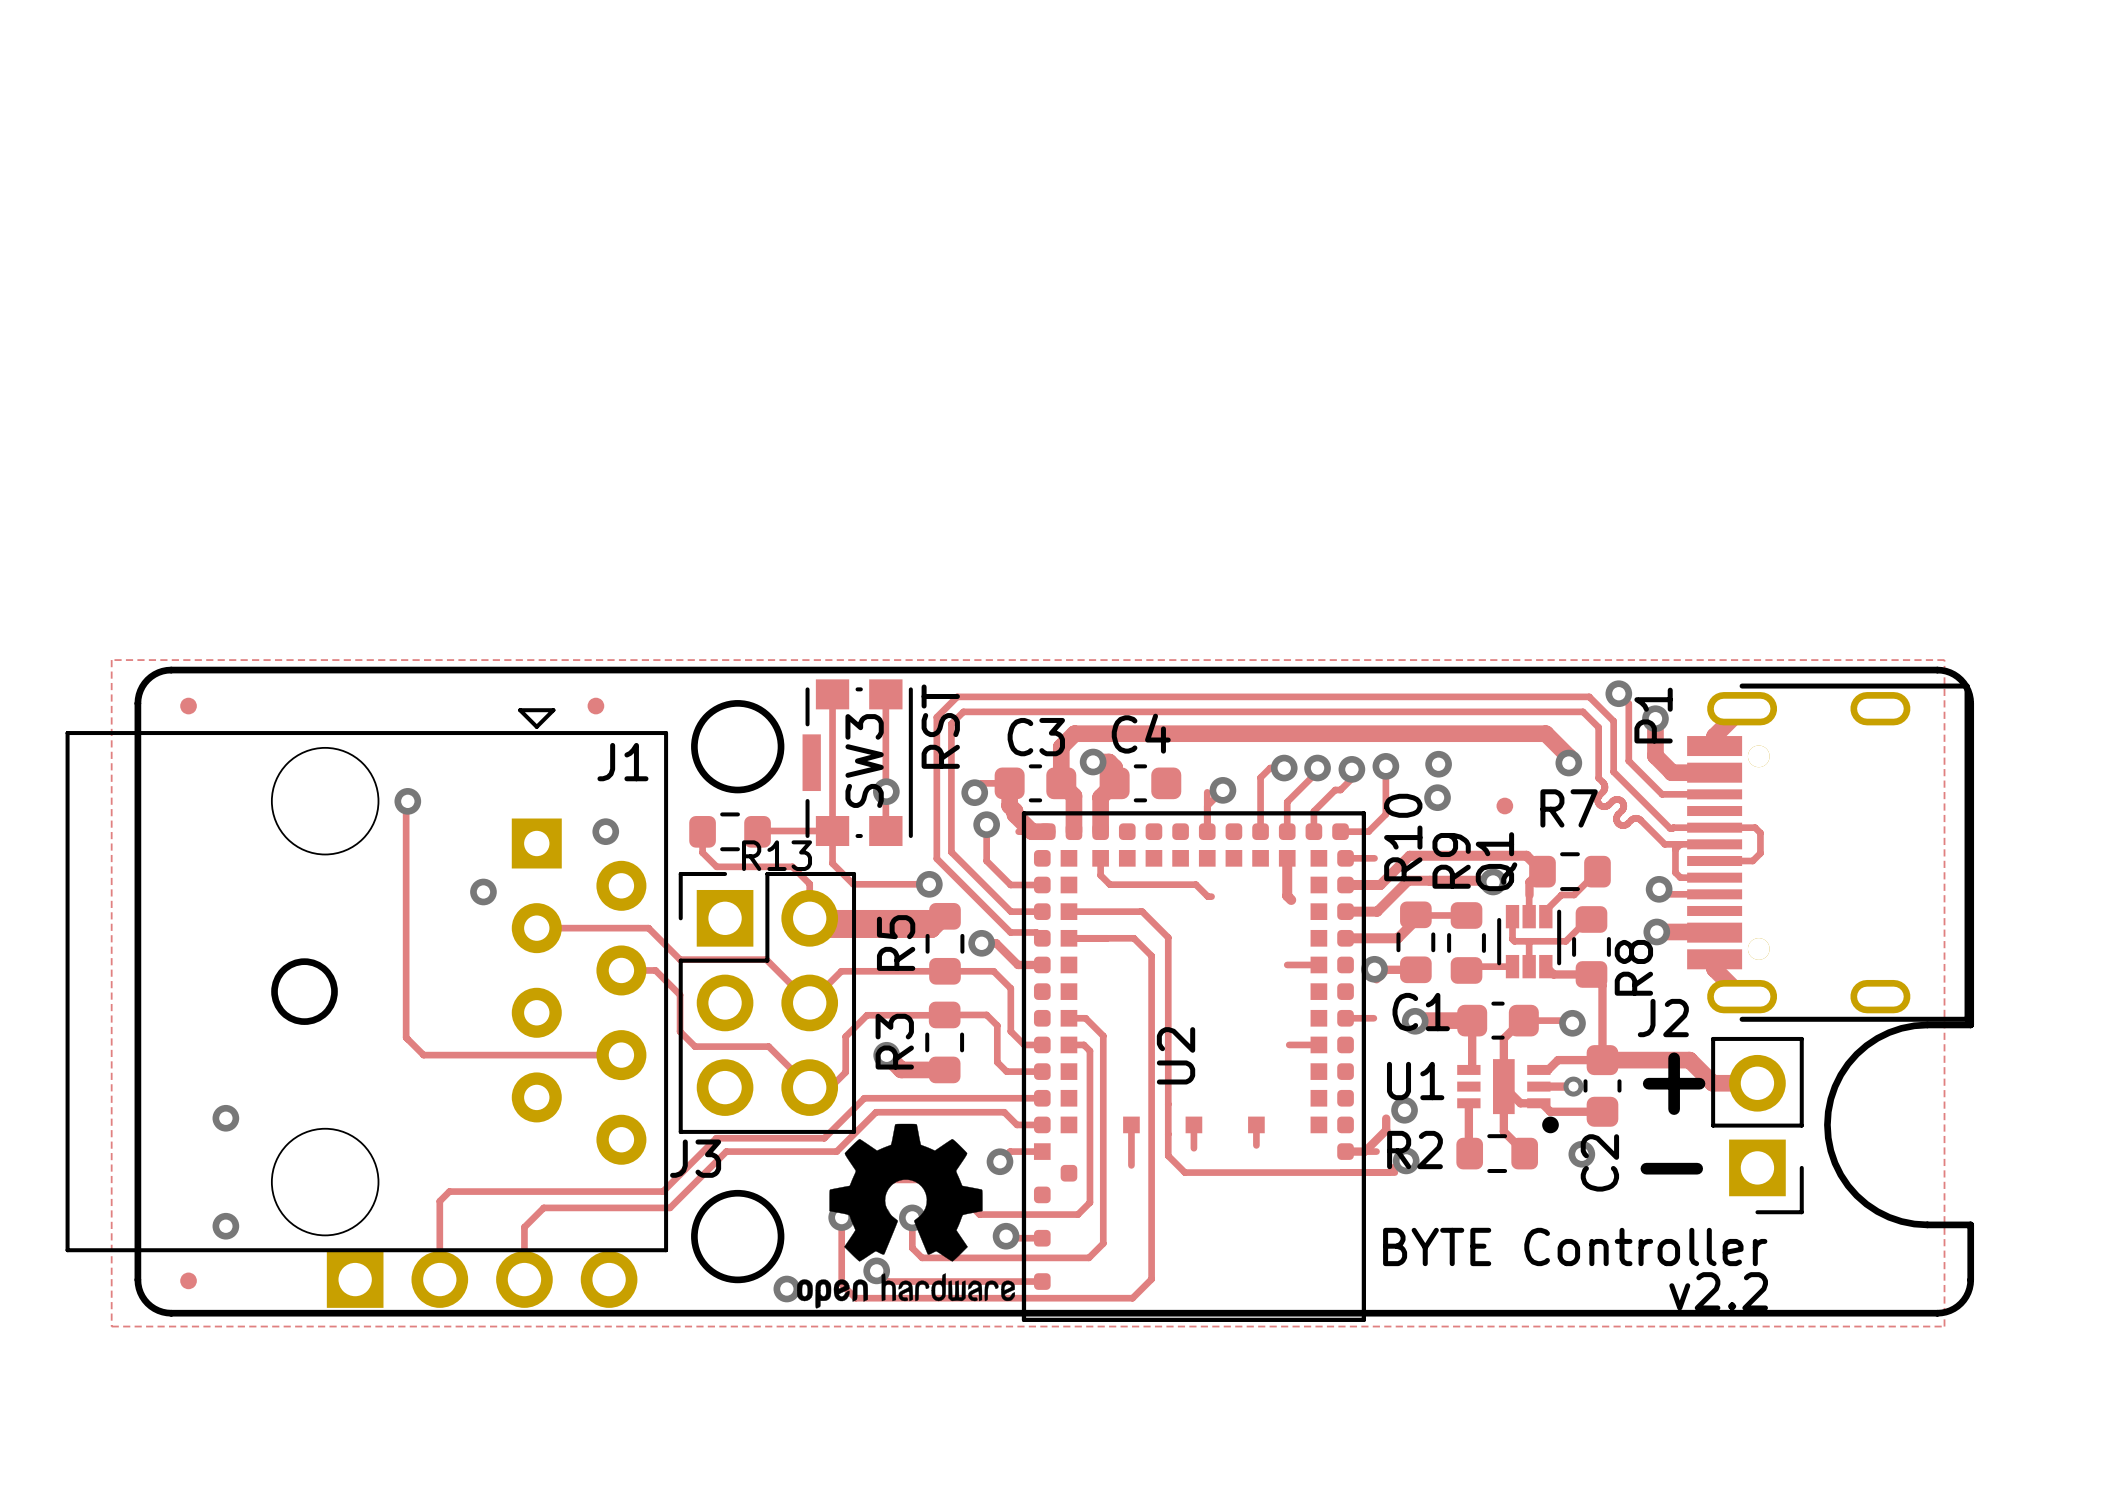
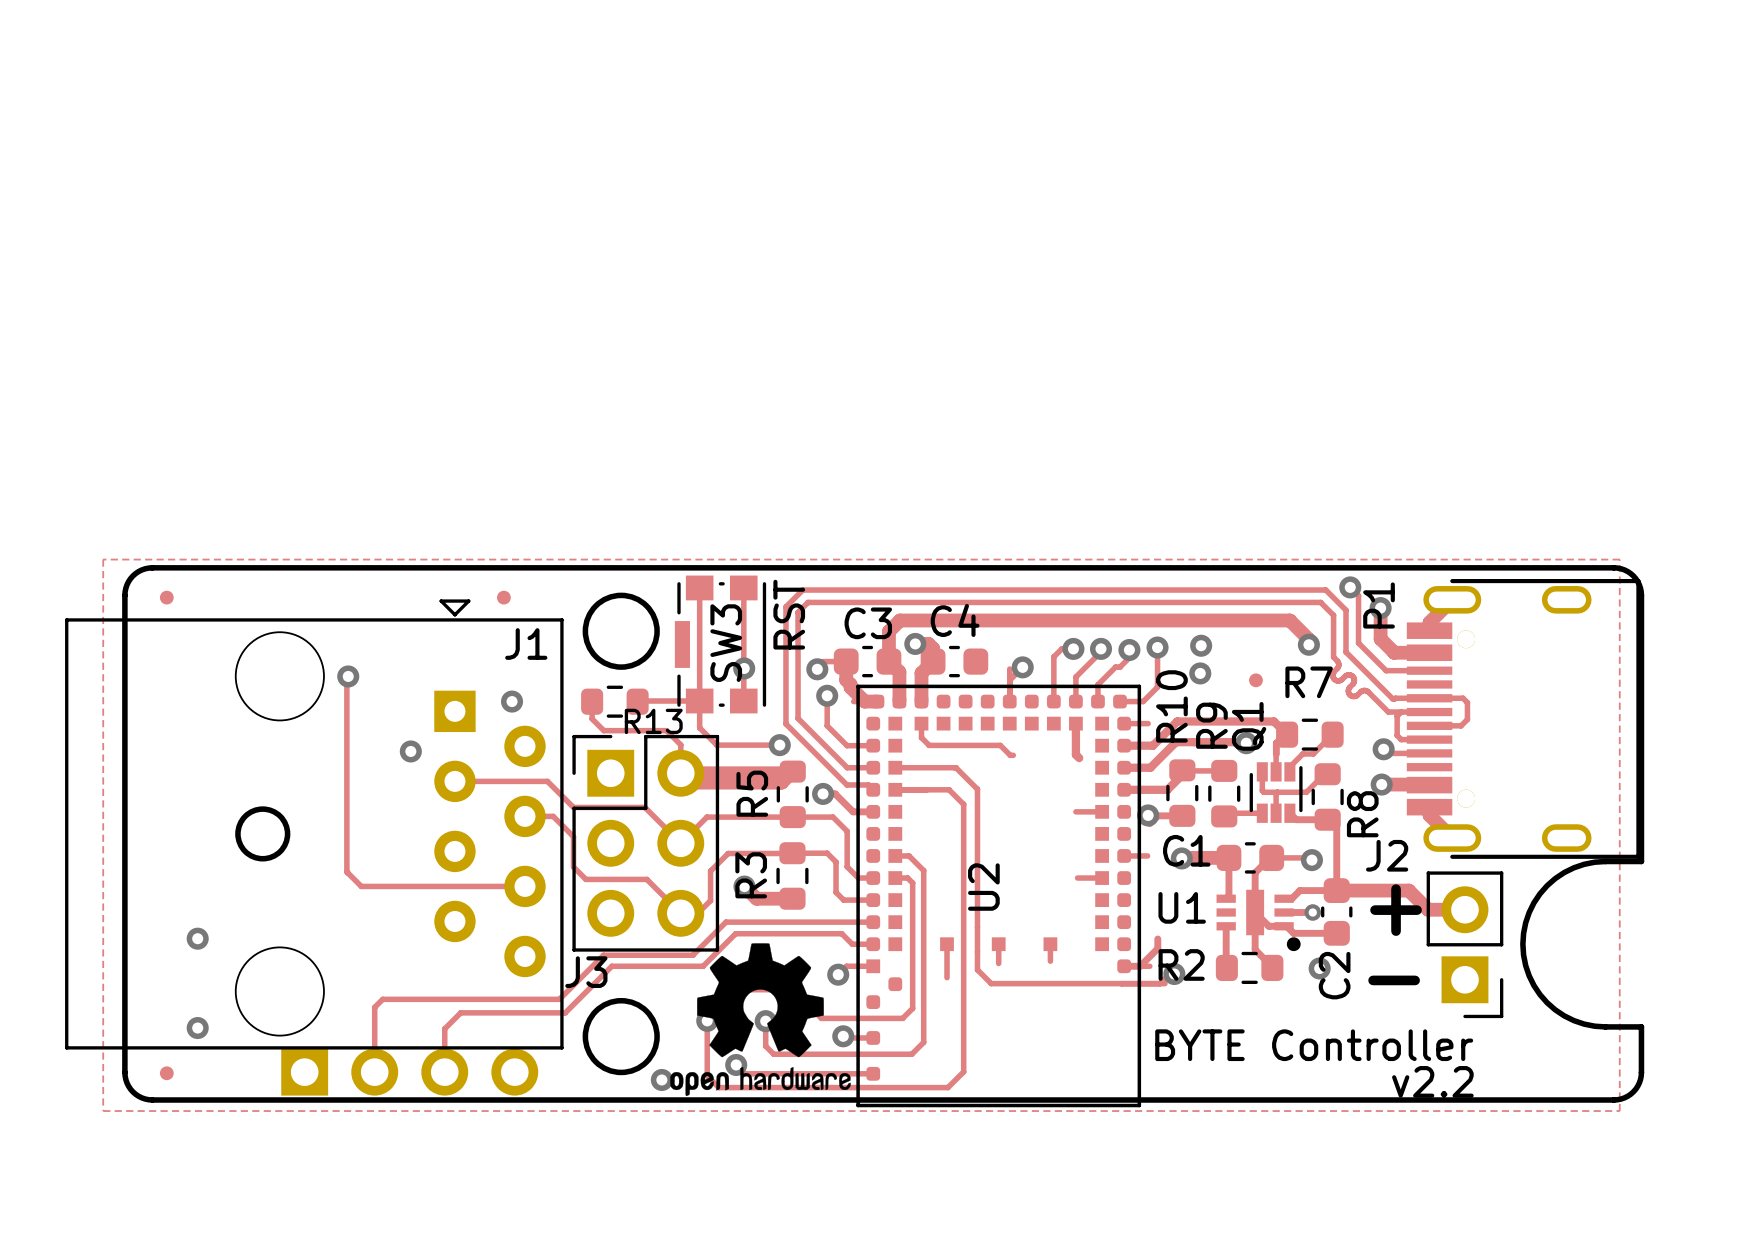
via: (1404, 1110) -> none

